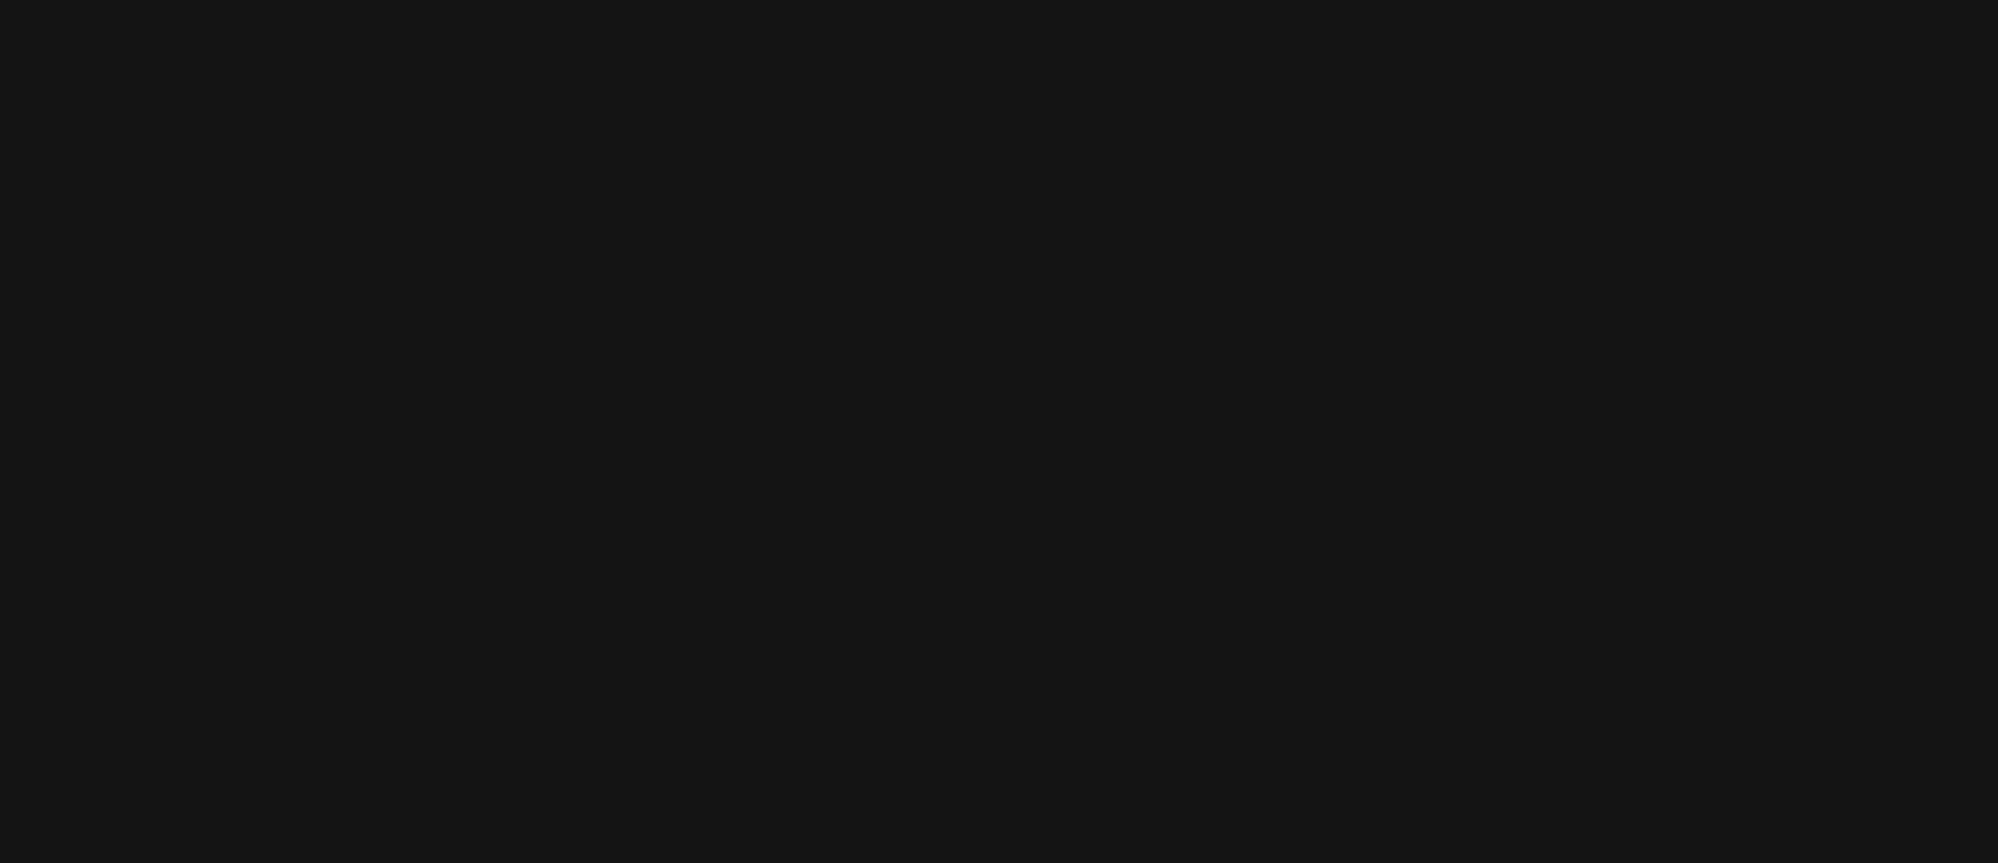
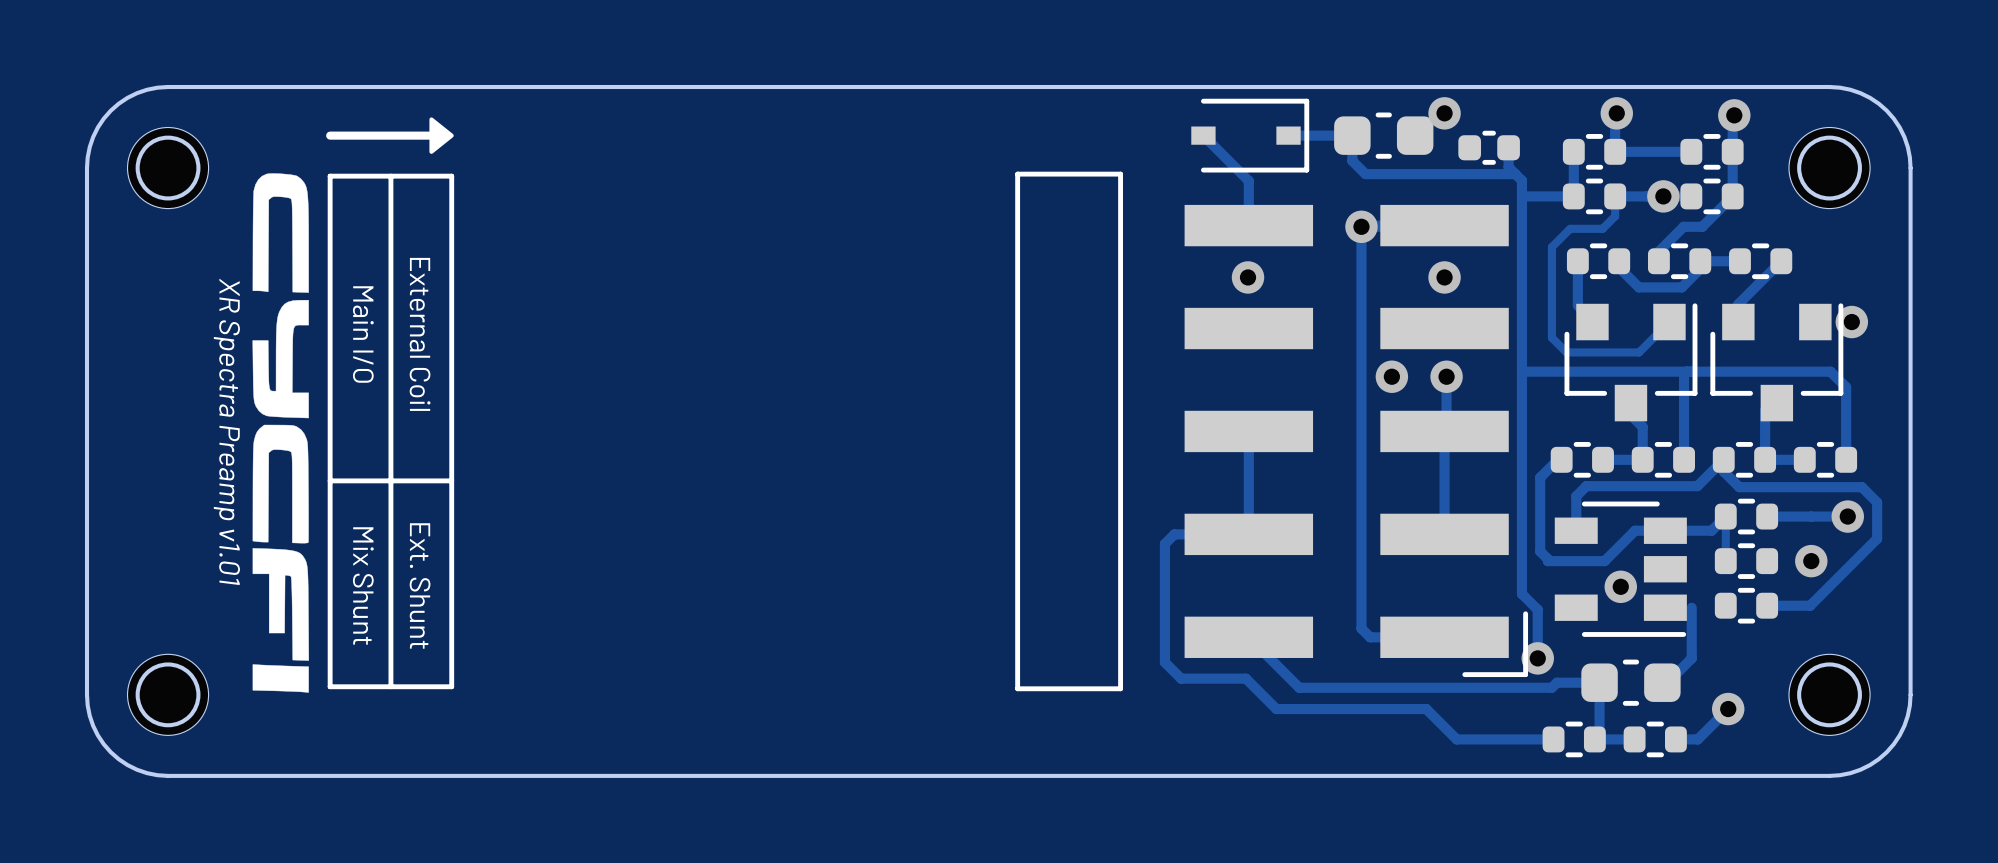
board edge: none -> (168, 87) (1829, 87) (1860, 93) (1878, 103) (1893, 118) (1904, 137) (1909, 157) (1910, 694) (1904, 725) (1886, 752) (1870, 765) (1850, 773) (1829, 775) (168, 775) (137, 769) (118, 759) (103, 744) (93, 725) (87, 705) (87, 168) (93, 137) (110, 110) (137, 93) (168, 87)
via: none -> (1444, 113)
track: none -> (1616, 113) (1615, 114) (1615, 151) (1691, 151)
via: none -> (1616, 113)
track: none -> (1734, 115) (1732, 116) (1732, 196) (1702, 226) (1683, 226) (1658, 251) (1658, 261)
via: none -> (1734, 115)
drawing: none -> [429, 117, 454, 154]
round board edge: none -> [135, 135, 201, 201]
line: none -> (330, 135) (439, 135)
track: none -> (1203, 135) (1248, 181) (1248, 225)
part: none -> (1250, 135)
track: none -> (1288, 135) (1352, 135) (1352, 160) (1365, 174) (1515, 174)
part: none -> (1383, 135)
round board edge: none -> [1797, 135, 1862, 201]
part: none -> (1489, 147)
track: none -> (1508, 147) (1508, 167) (1521, 180) (1521, 593) (1537, 609) (1537, 658)
track: none -> (1573, 151) (1573, 196) (1523, 196) (1521, 194)
part: none -> (1594, 151)
part: none -> (1712, 151)
part: none -> (168, 168)
part: none -> (1829, 168)
drawing: none -> [252, 173, 309, 693]
line: none -> (330, 176) (451, 176) (451, 686) (330, 686) (330, 176)
line: none -> (390, 176) (390, 686)
part: none -> (1594, 196)
via: none -> (1663, 196)
track: none -> (1691, 196) (1615, 196) (1615, 216) (1602, 228) (1570, 228) (1551, 247) (1551, 337) (1566, 352) (1639, 352) (1669, 322) (1669, 332)
part: none -> (1712, 196)
track: none -> (1361, 226) (1443, 226) (1444, 225) (1374, 225) (1361, 238) (1361, 628) (1370, 637) (1444, 637)
via: none -> (1361, 226)
track: none -> (1577, 261) (1577, 305) (1592, 322)
part: none -> (1598, 261)
track: none -> (1619, 261) (1619, 267) (1638, 287) (1681, 287) (1700, 268) (1700, 261) (1739, 261)
part: none -> (1679, 261)
part: none -> (1760, 261)
track: none -> (1781, 261) (1738, 304) (1738, 322)
via: none -> (1248, 277)
via: none -> (1444, 277)
via: none -> (1851, 322)
text: none -> Main I/O (363, 334)
text: none -> External Coil (420, 334)
part: none -> (1630, 362)
part: none -> (1776, 362)
track: none -> (1686, 371) (1684, 374) (1684, 459)
track: none -> (1521, 374) (1524, 371) (1830, 371) (1846, 387) (1846, 459)
via: none -> (1391, 376)
track: none -> (1446, 376) (1444, 534)
via: none -> (1446, 376)
track: none -> (1630, 403) (1630, 415) (1642, 426) (1642, 459) (1603, 459)
track: none -> (1776, 403) (1772, 403) (1765, 410) (1765, 459) (1804, 459)
text: none -> XR Spectra Preamp v1.01 (226, 431)
track: none -> (1248, 431) (1248, 534) (1174, 534) (1164, 543) (1164, 662) (1181, 678) (1245, 678) (1276, 709) (1426, 709) (1456, 739) (1553, 739)
part: none -> (1271, 431)
part: none -> (1582, 459)
part: none -> (1663, 459)
part: none -> (1744, 459)
part: none -> (1825, 459)
track: none -> (1561, 467) (1561, 459) (1558, 459) (1540, 477) (1540, 551) (1547, 561) (1604, 561) (1635, 530) (1711, 530) (1725, 516) (1725, 561)
line: none -> (330, 480) (451, 480)
part: none -> (1746, 516)
track: none -> (1767, 516) (1847, 516)
via: none -> (1847, 516)
track: none -> (1576, 530) (1576, 496) (1586, 486) (1697, 486) (1723, 459) (1723, 471) (1739, 487) (1861, 487) (1877, 502) (1877, 538) (1810, 605) (1767, 605)
part: none -> (1746, 561)
via: none -> (1811, 561)
part: none -> (1620, 569)
text: none -> Mix Shunt (363, 585)
text: none -> Ext. Shunt (420, 585)
via: none -> (1620, 586)
part: none -> (1746, 605)
track: none -> (1691, 607) (1691, 658) (1667, 682) (1662, 682)
track: none -> (1248, 637) (1299, 687) (1551, 687) (1556, 682) (1599, 682) (1599, 734) (1594, 739) (1634, 739)
via: none -> (1537, 658)
round board edge: none -> [135, 662, 201, 728]
round board edge: none -> [1797, 662, 1862, 728]
part: none -> (1630, 682)
part: none -> (168, 694)
part: none -> (1829, 694)
track: none -> (1728, 709) (1697, 739) (1675, 739)
via: none -> (1728, 709)
part: none -> (1574, 739)
part: none -> (1655, 739)

